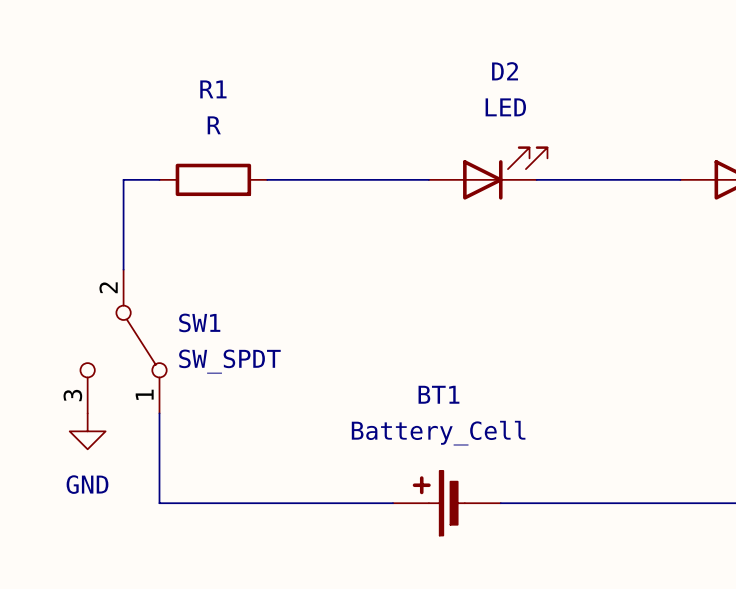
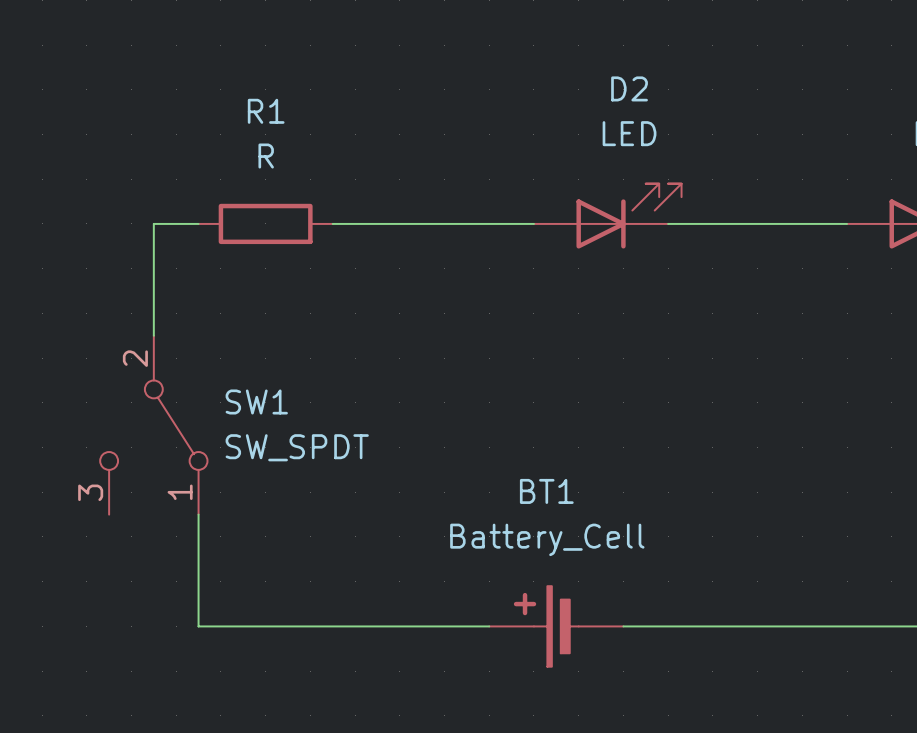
power symbol: GND (87, 431) -> none

